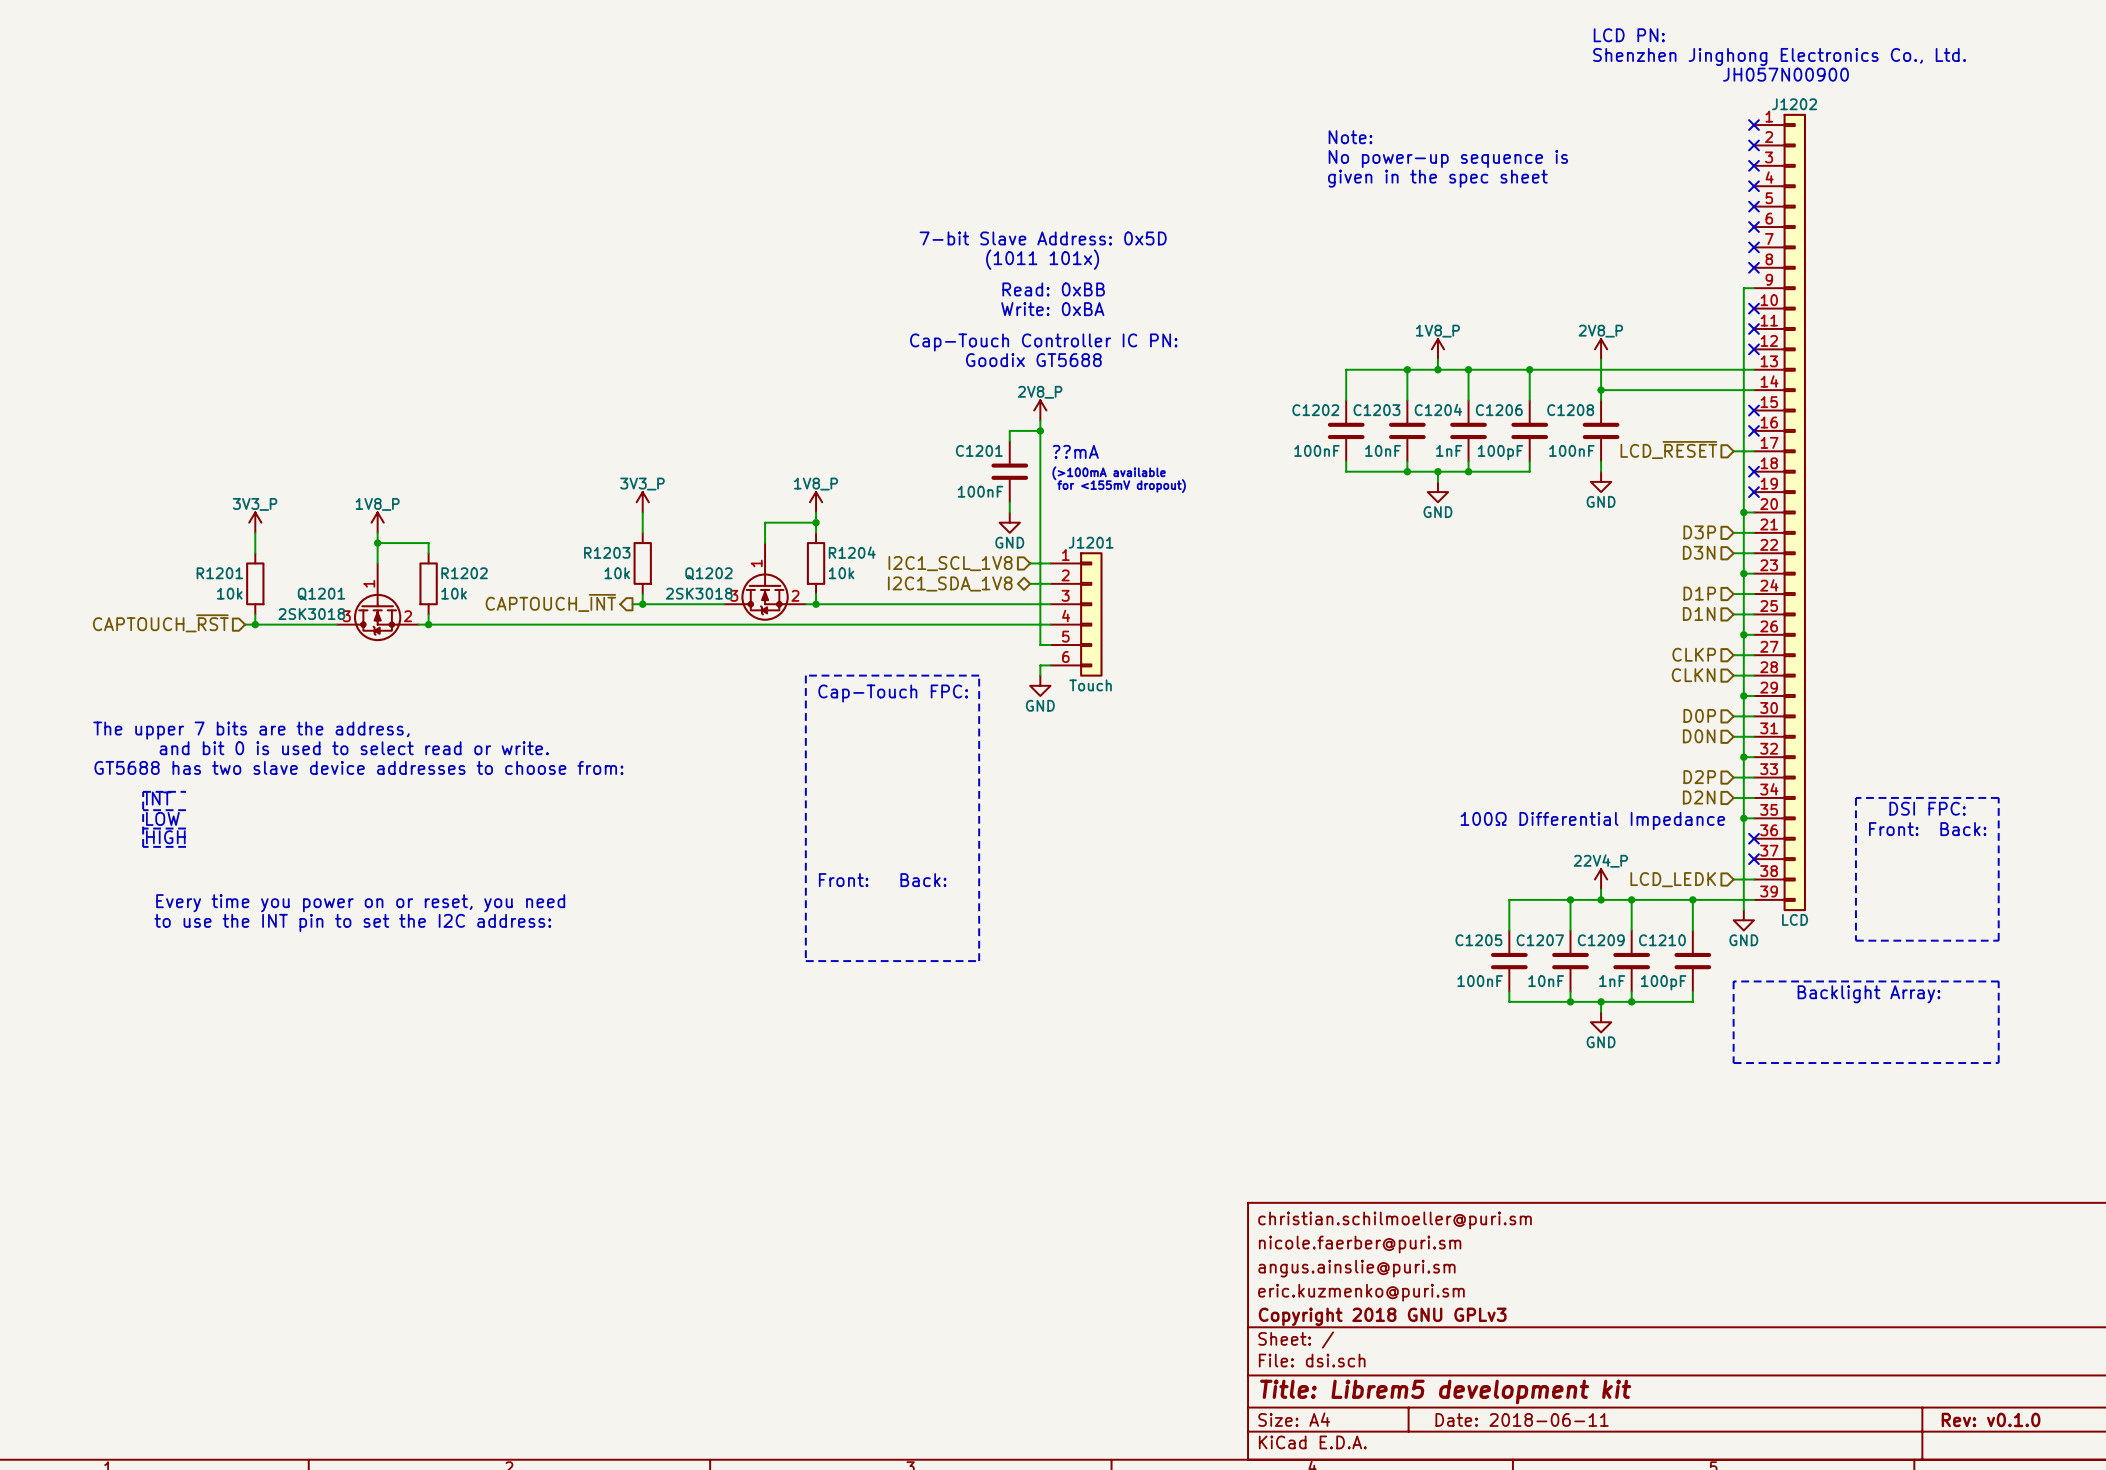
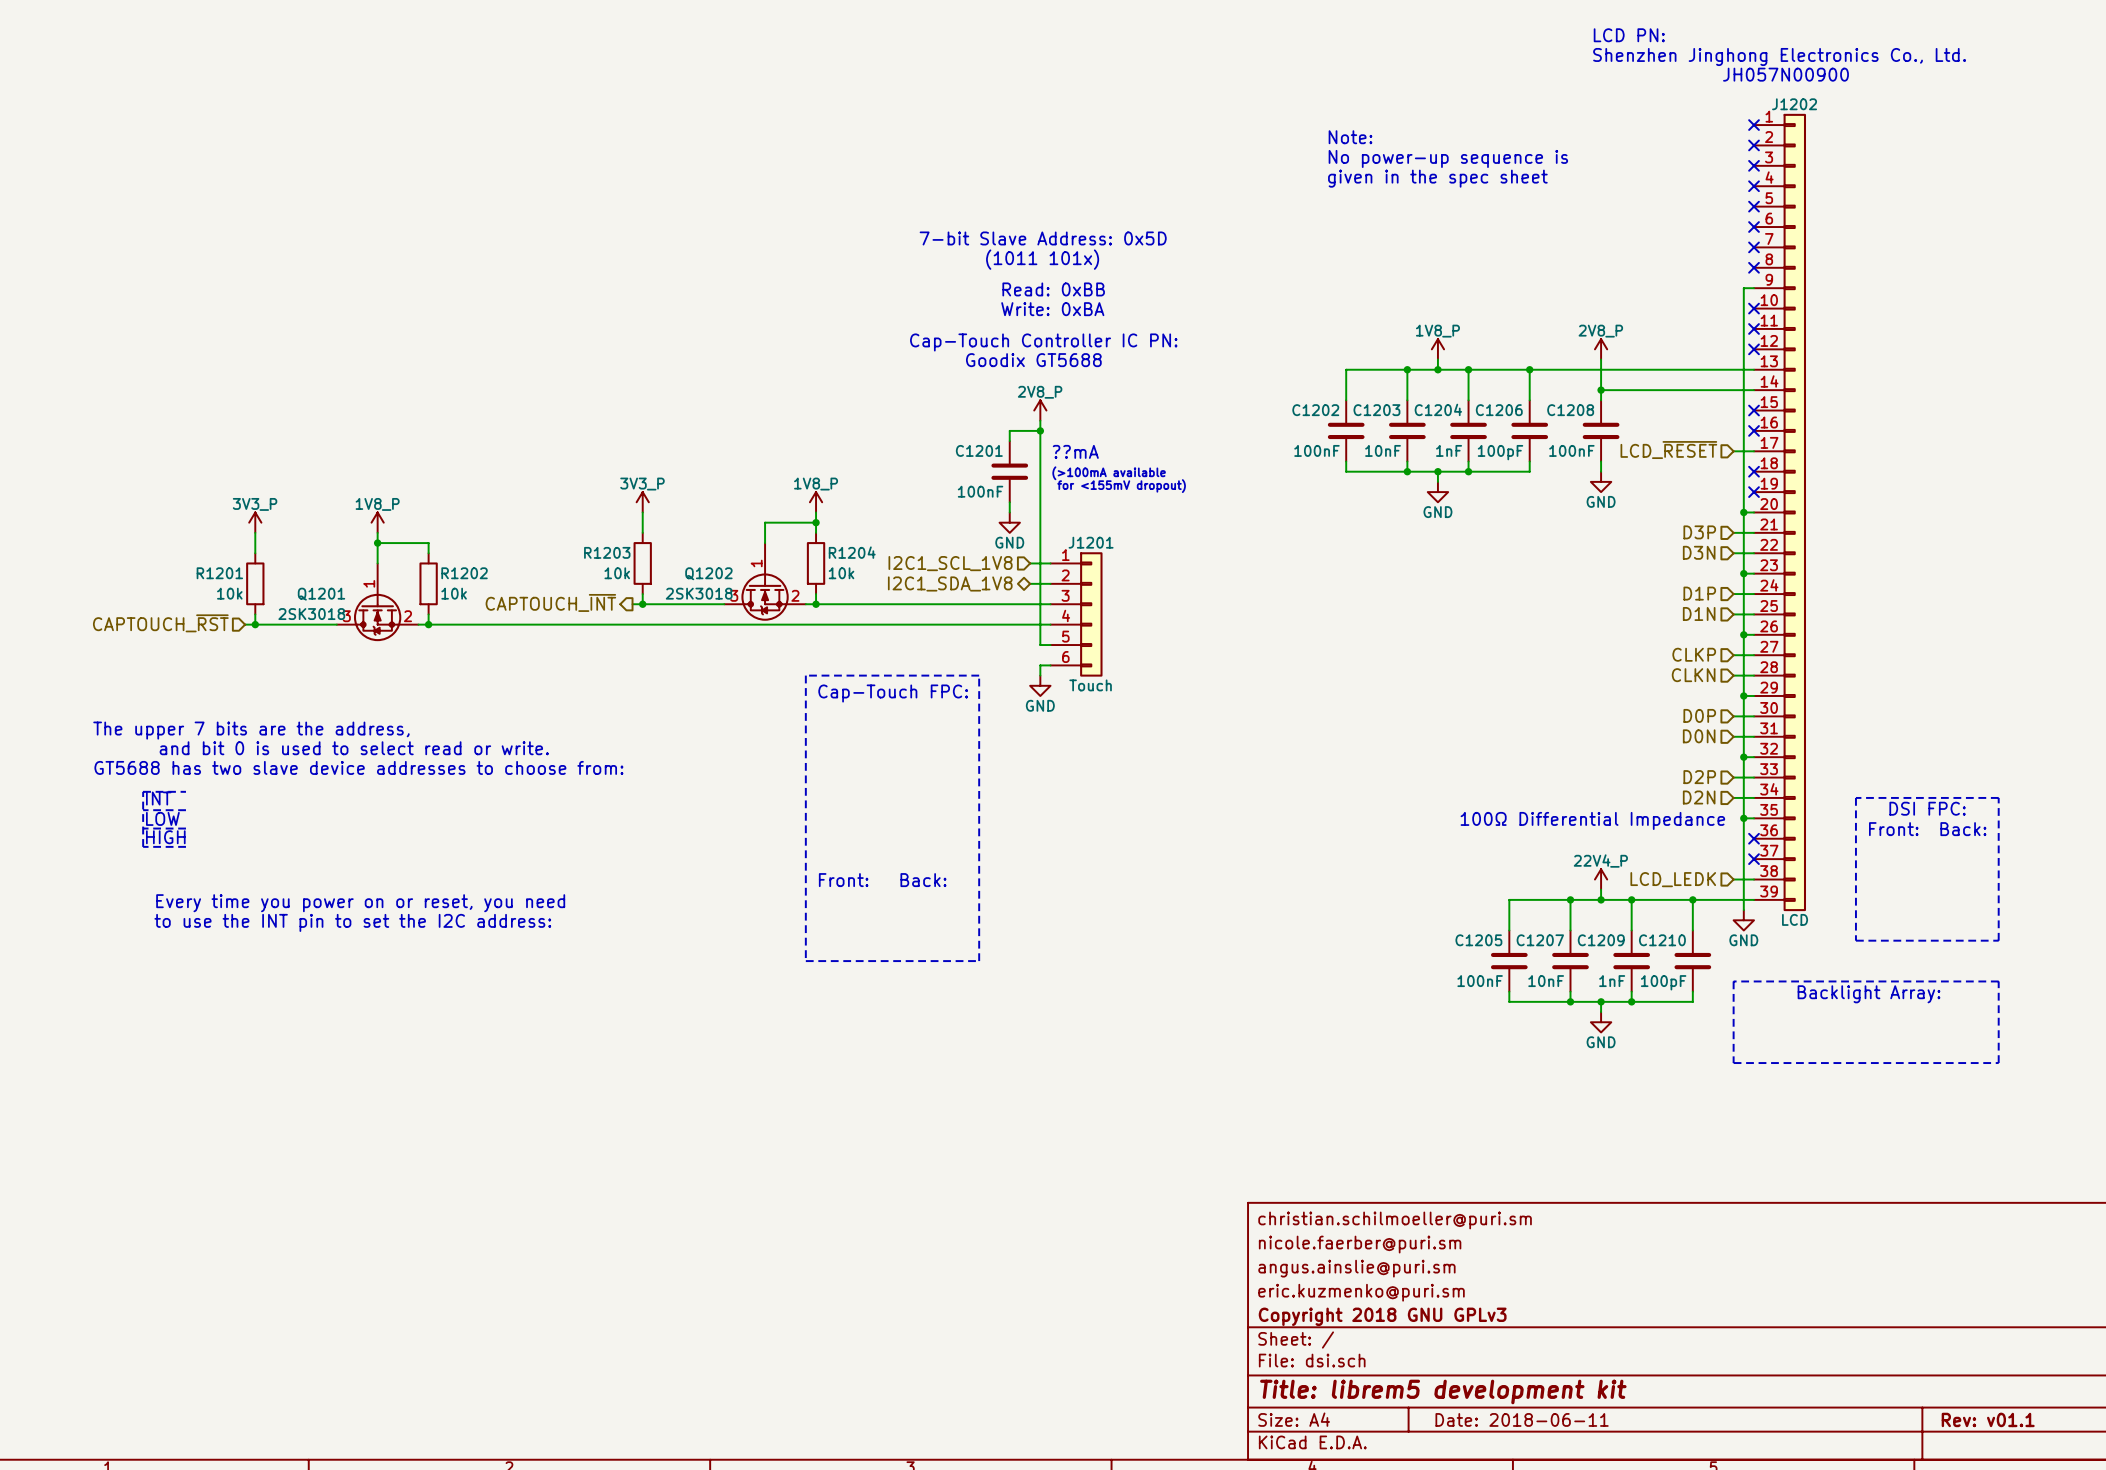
title block: Title: Librem5 development kit (1445, 1391) -> Title: librem5 development kit (1443, 1391)
title block: Rev: v0.1.0 (1991, 1419) -> Rev: v01.1 (1988, 1419)

